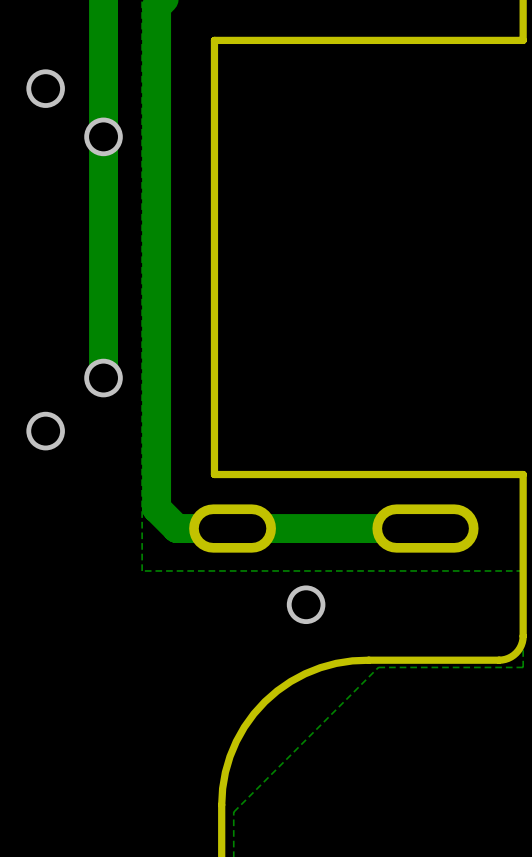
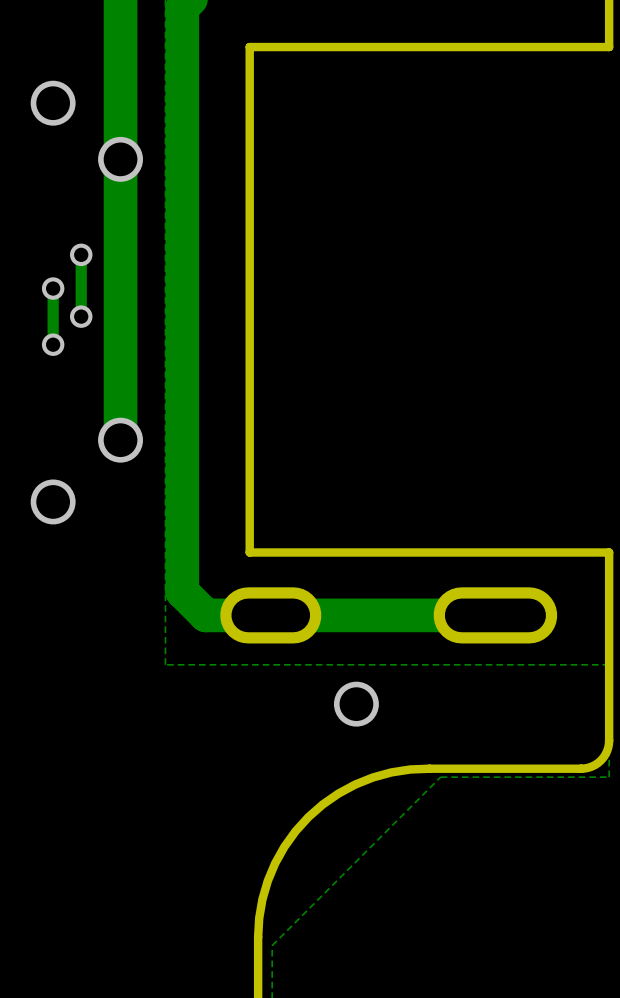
track: none -> (81, 254) (81, 316)
via: none -> (81, 254)
track: none -> (53, 288) (53, 344)
via: none -> (53, 288)
via: none -> (81, 316)
via: none -> (53, 344)

